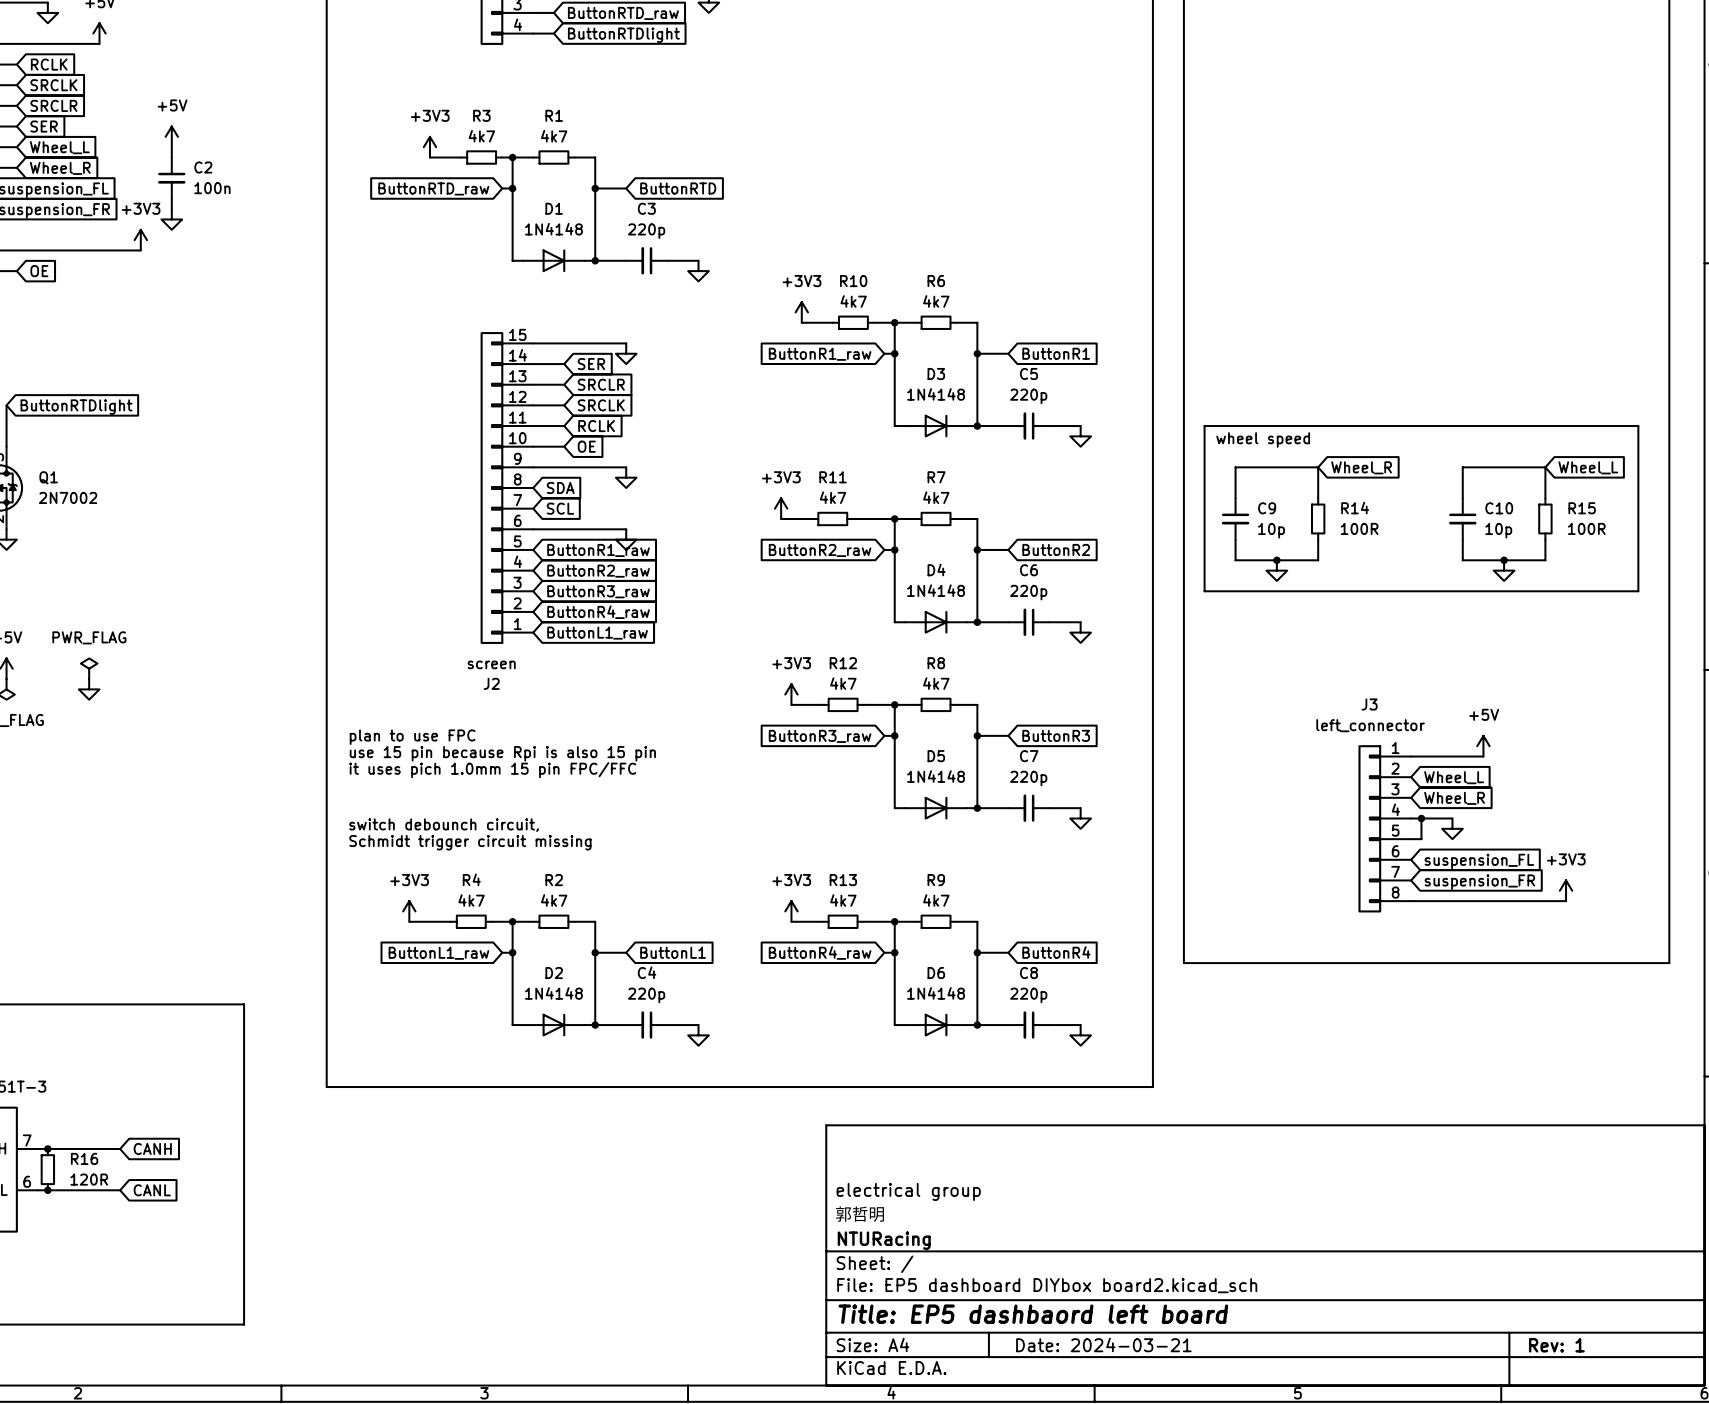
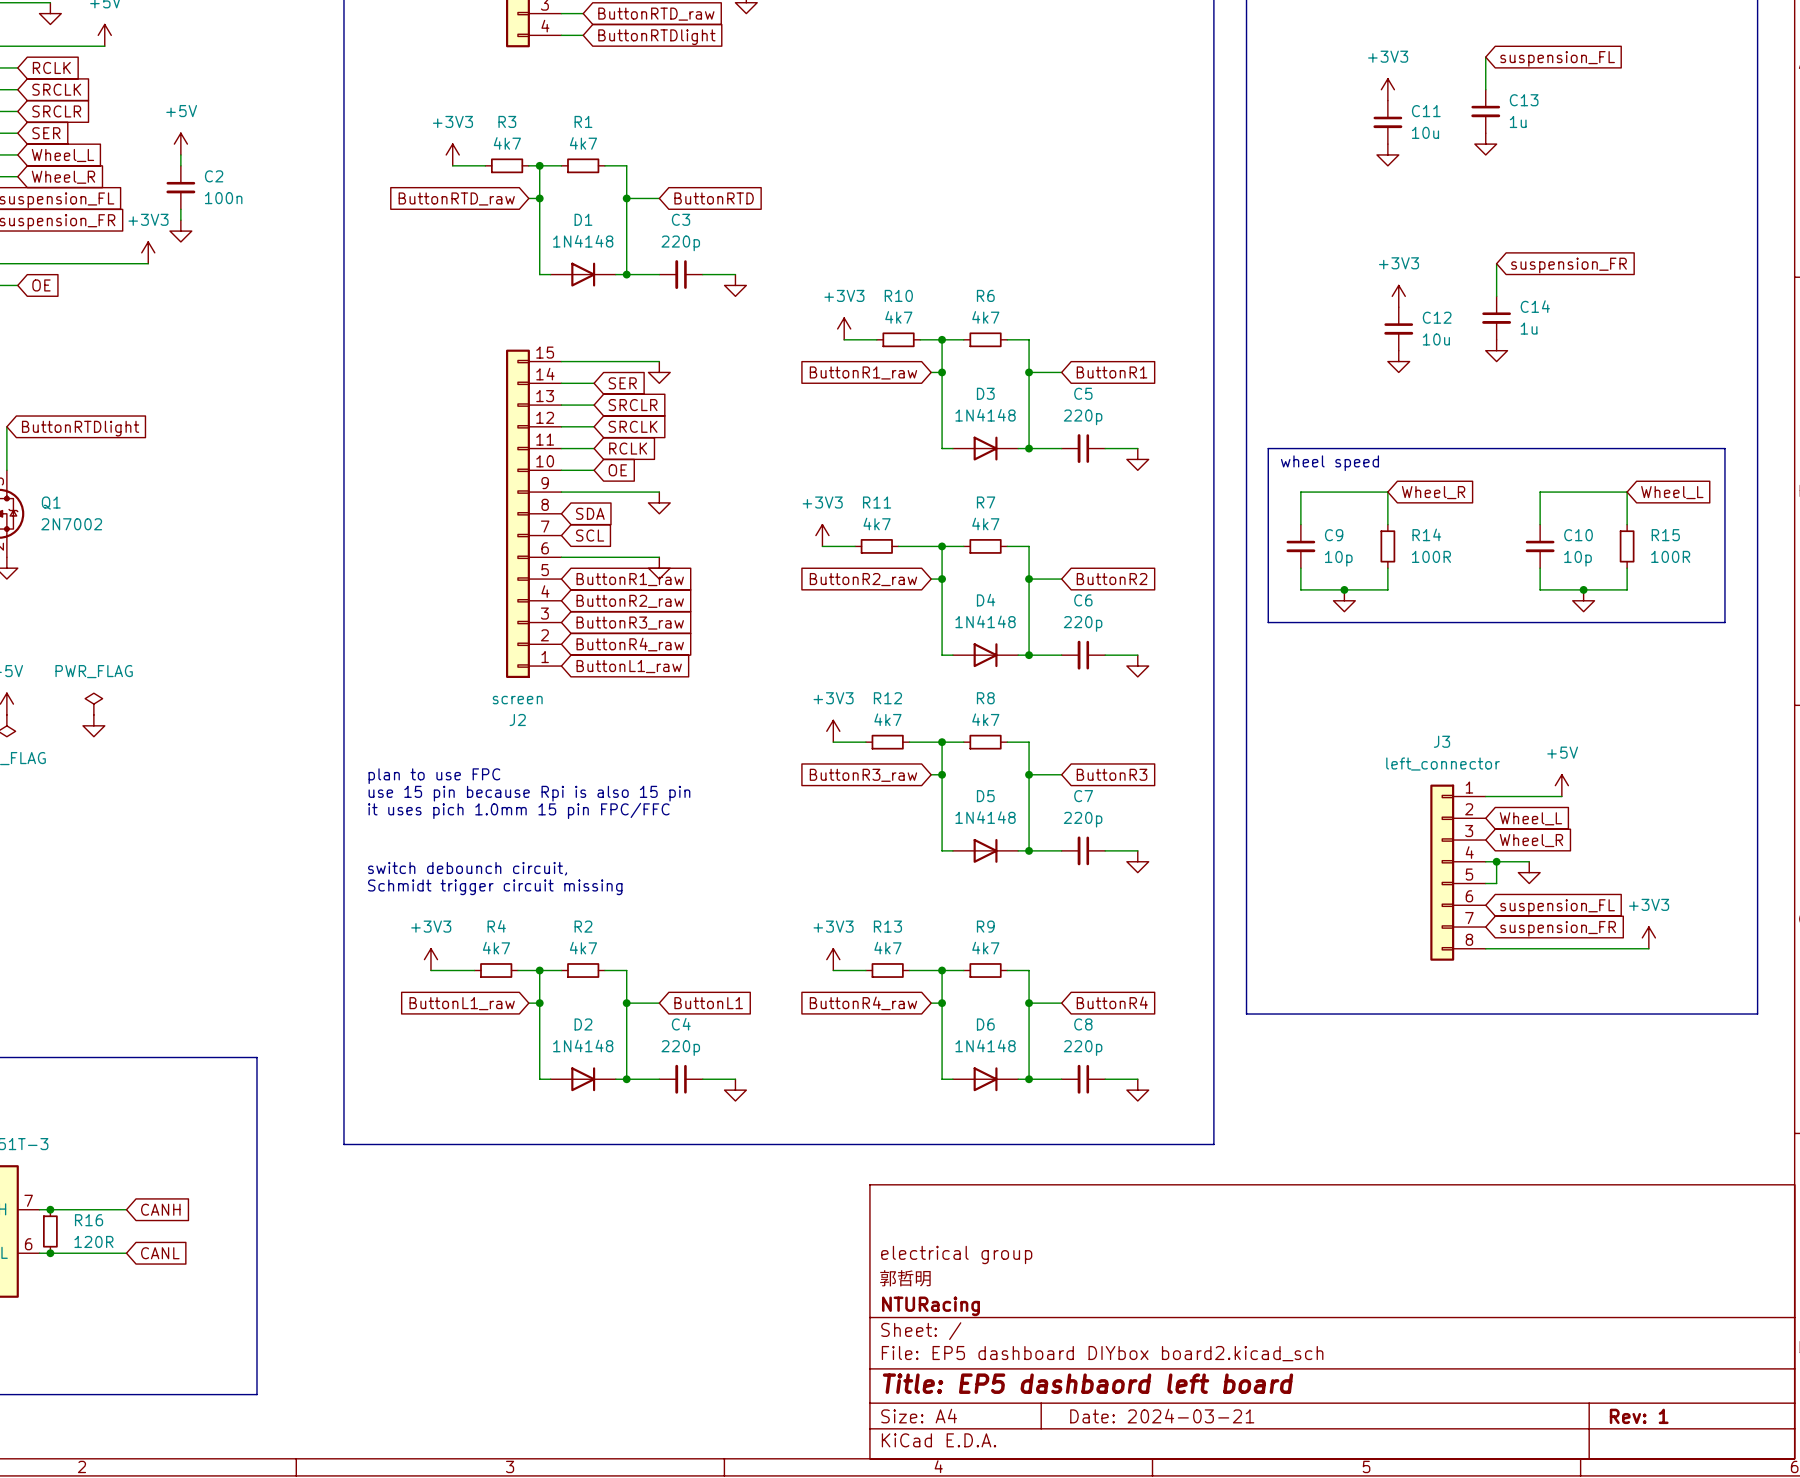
wire: none -> (1485, 57) (1485, 89)
global label: none -> suspension_FL (1557, 58)
power symbol: none -> +3V3 (1387, 89)
C13: none -> 1u (1485, 111)
C11: none -> 10u (1387, 122)
power symbol: none -> (1485, 144)
power symbol: none -> (1387, 154)
wire: none -> (1496, 263) (1496, 296)
global label: none -> suspension_FR (1569, 265)
power symbol: none -> +3V3 (1398, 296)
C14: none -> 1u (1496, 318)
C12: none -> 10u (1398, 328)
power symbol: none -> (1496, 350)
power symbol: none -> (1398, 361)

